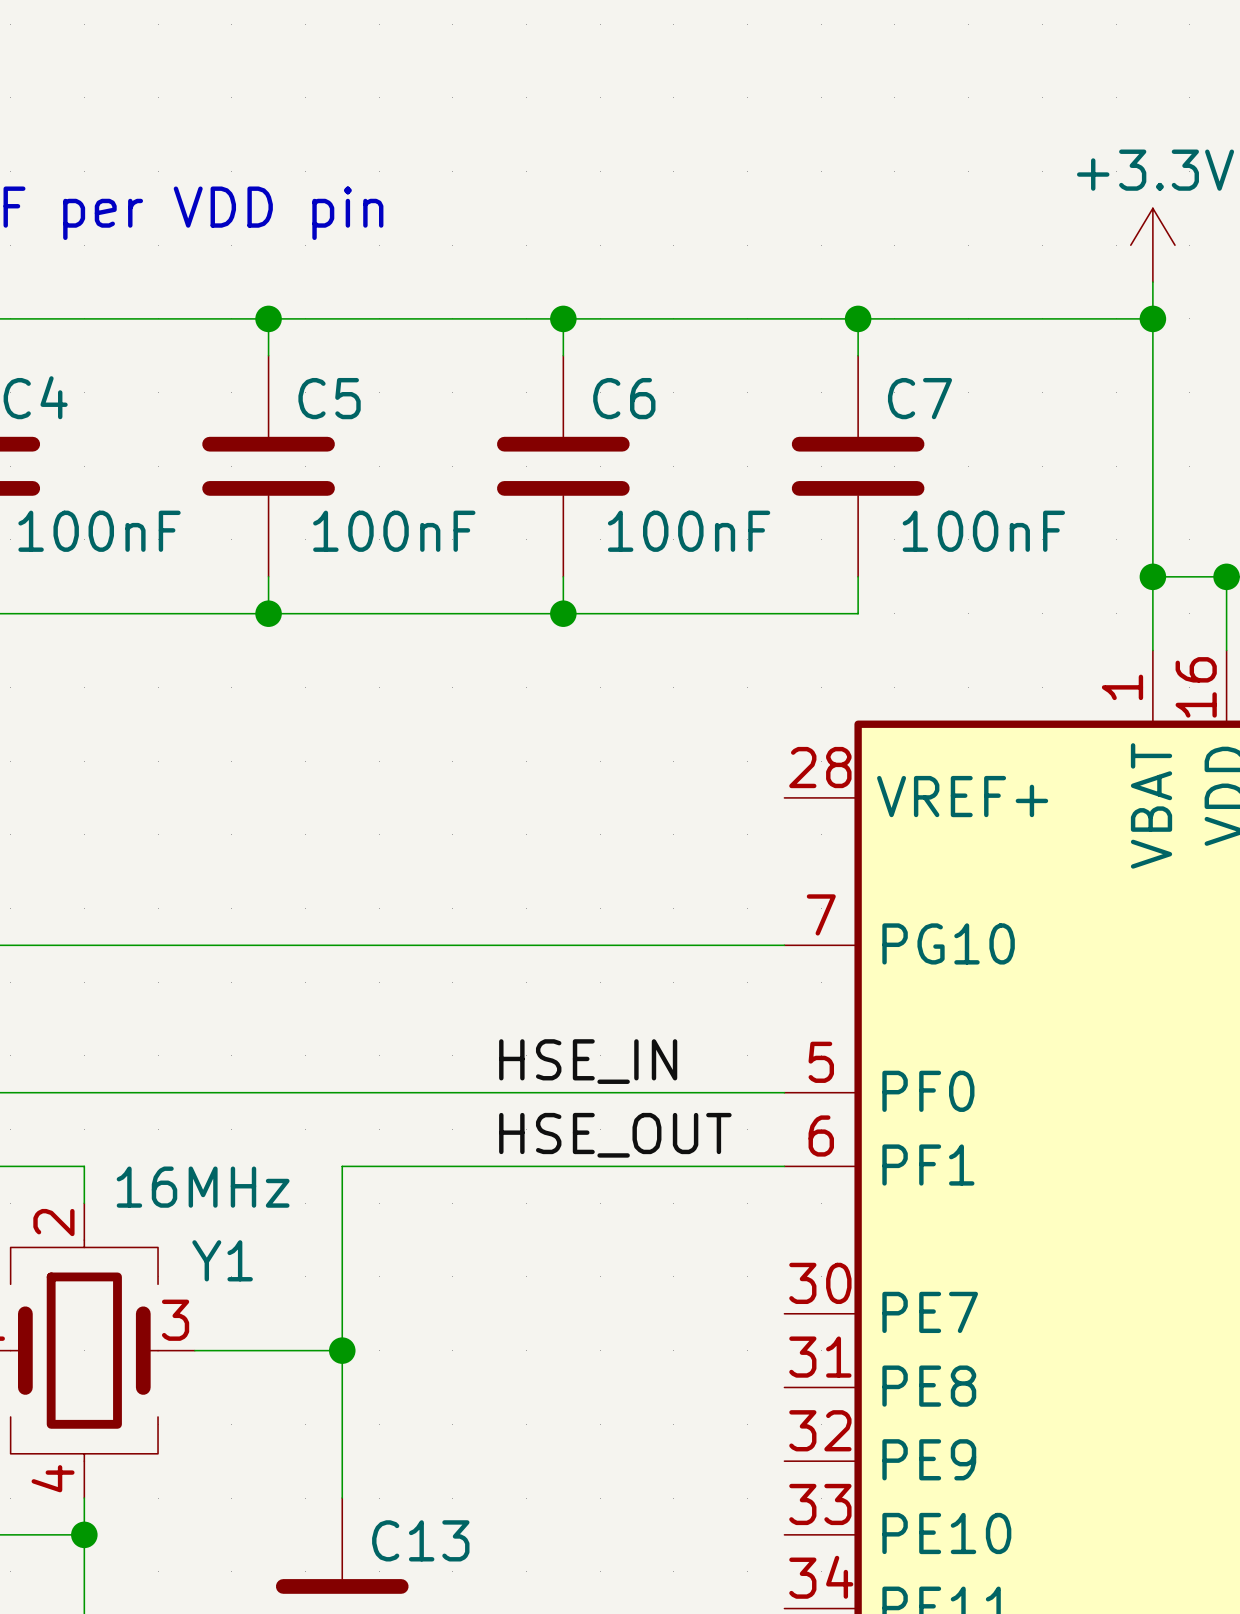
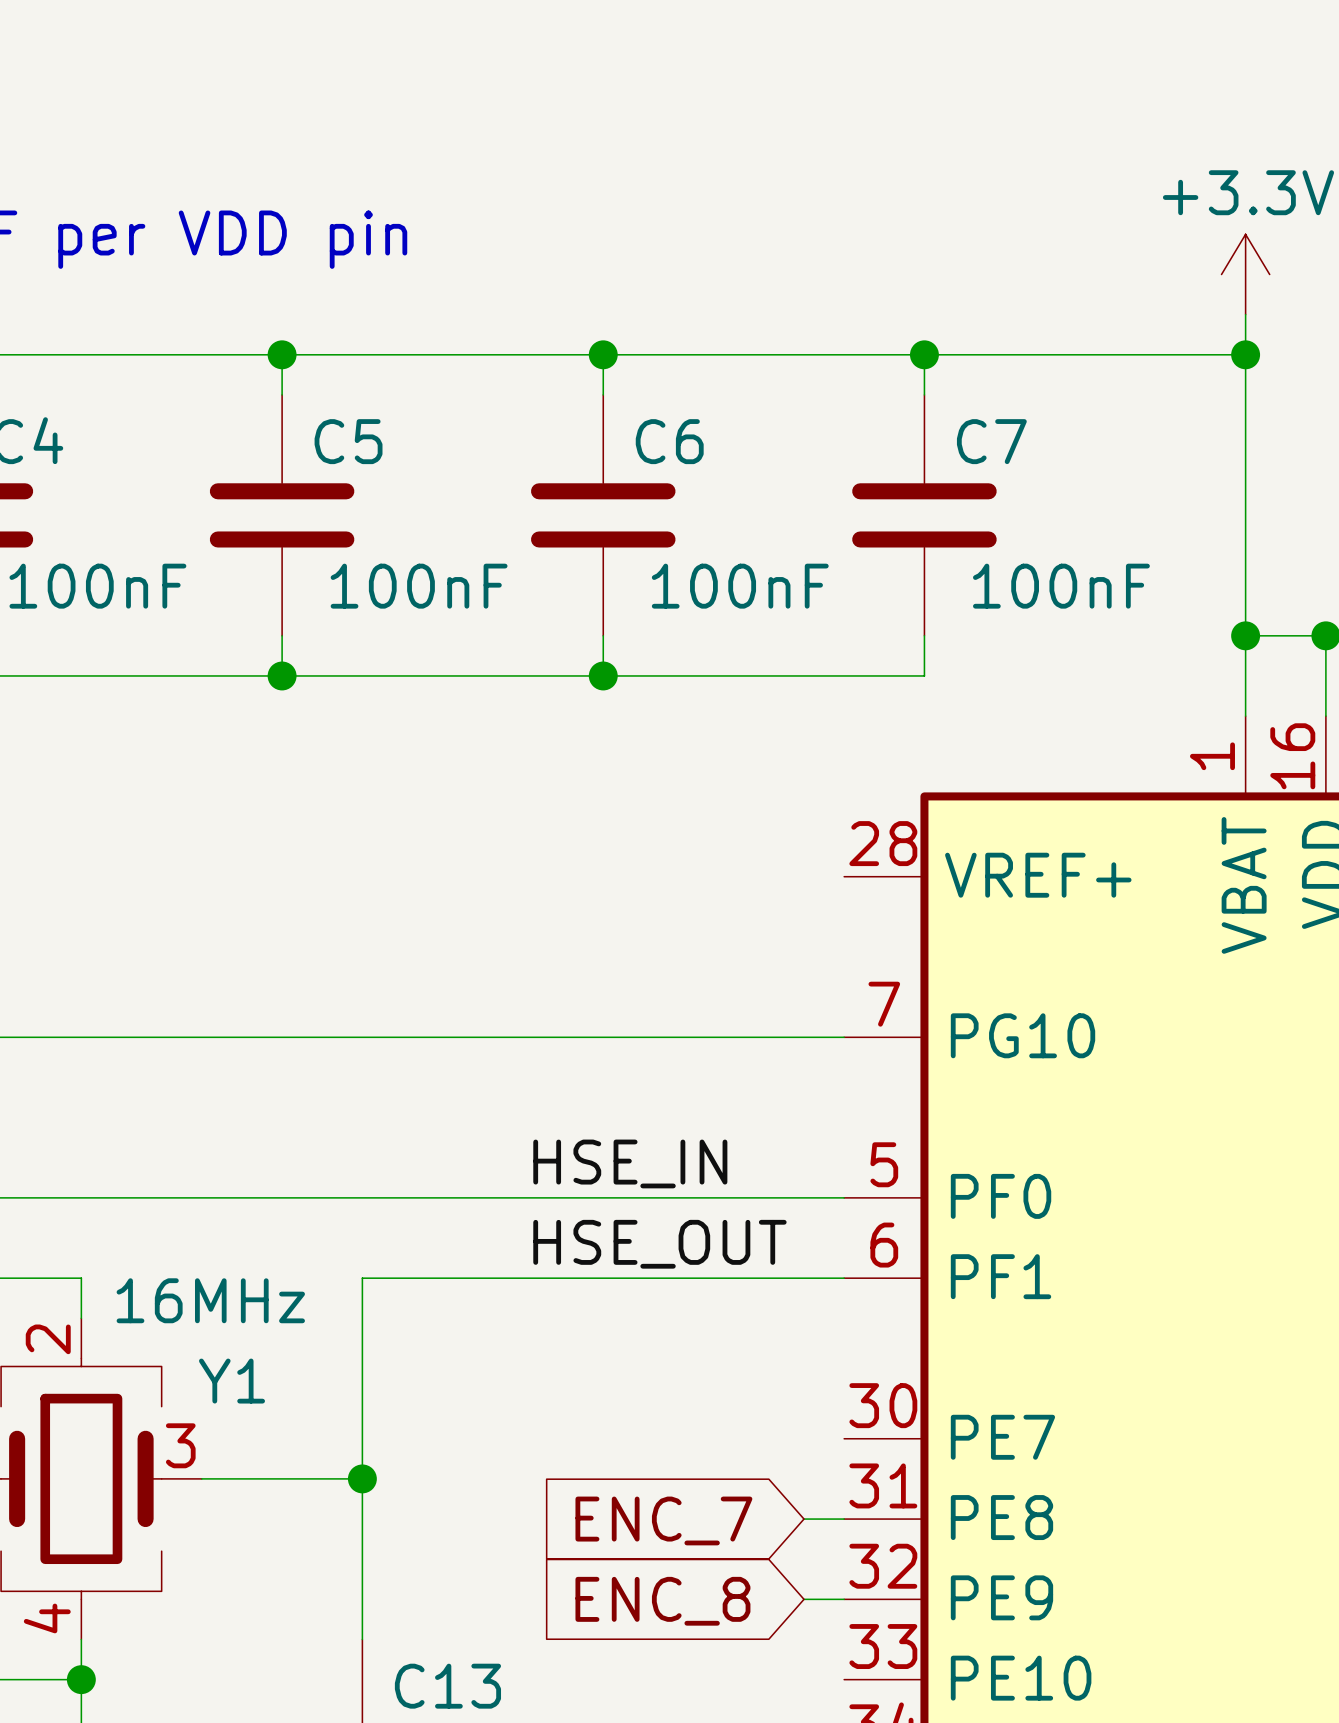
wire: none -> (804, 1519) (844, 1519)
global label: none -> ENC_7 (663, 1520)
wire: none -> (804, 1599) (844, 1599)
global label: none -> ENC_8 (662, 1601)

